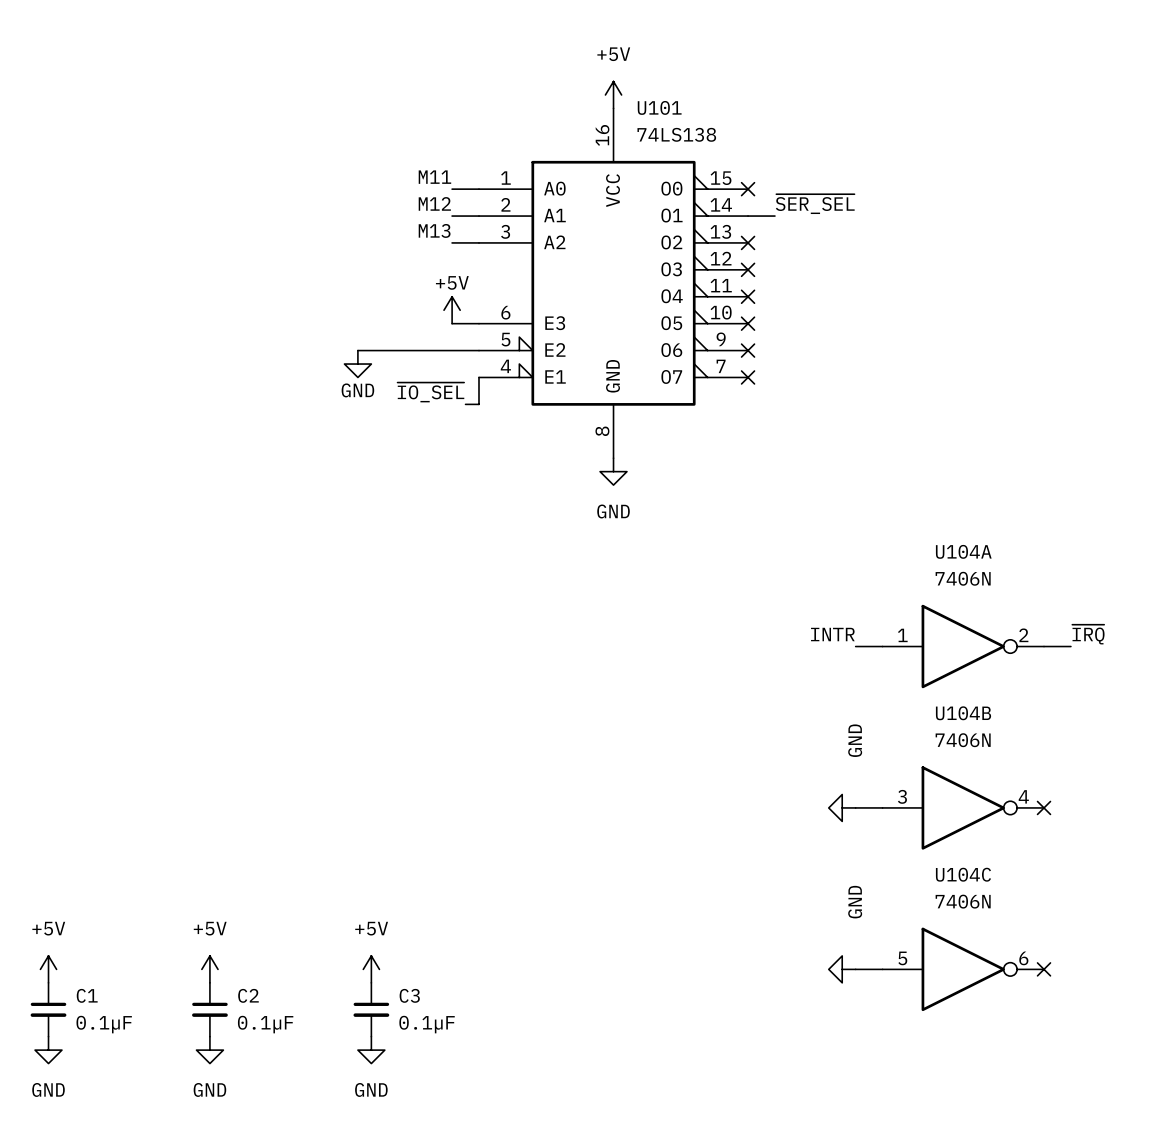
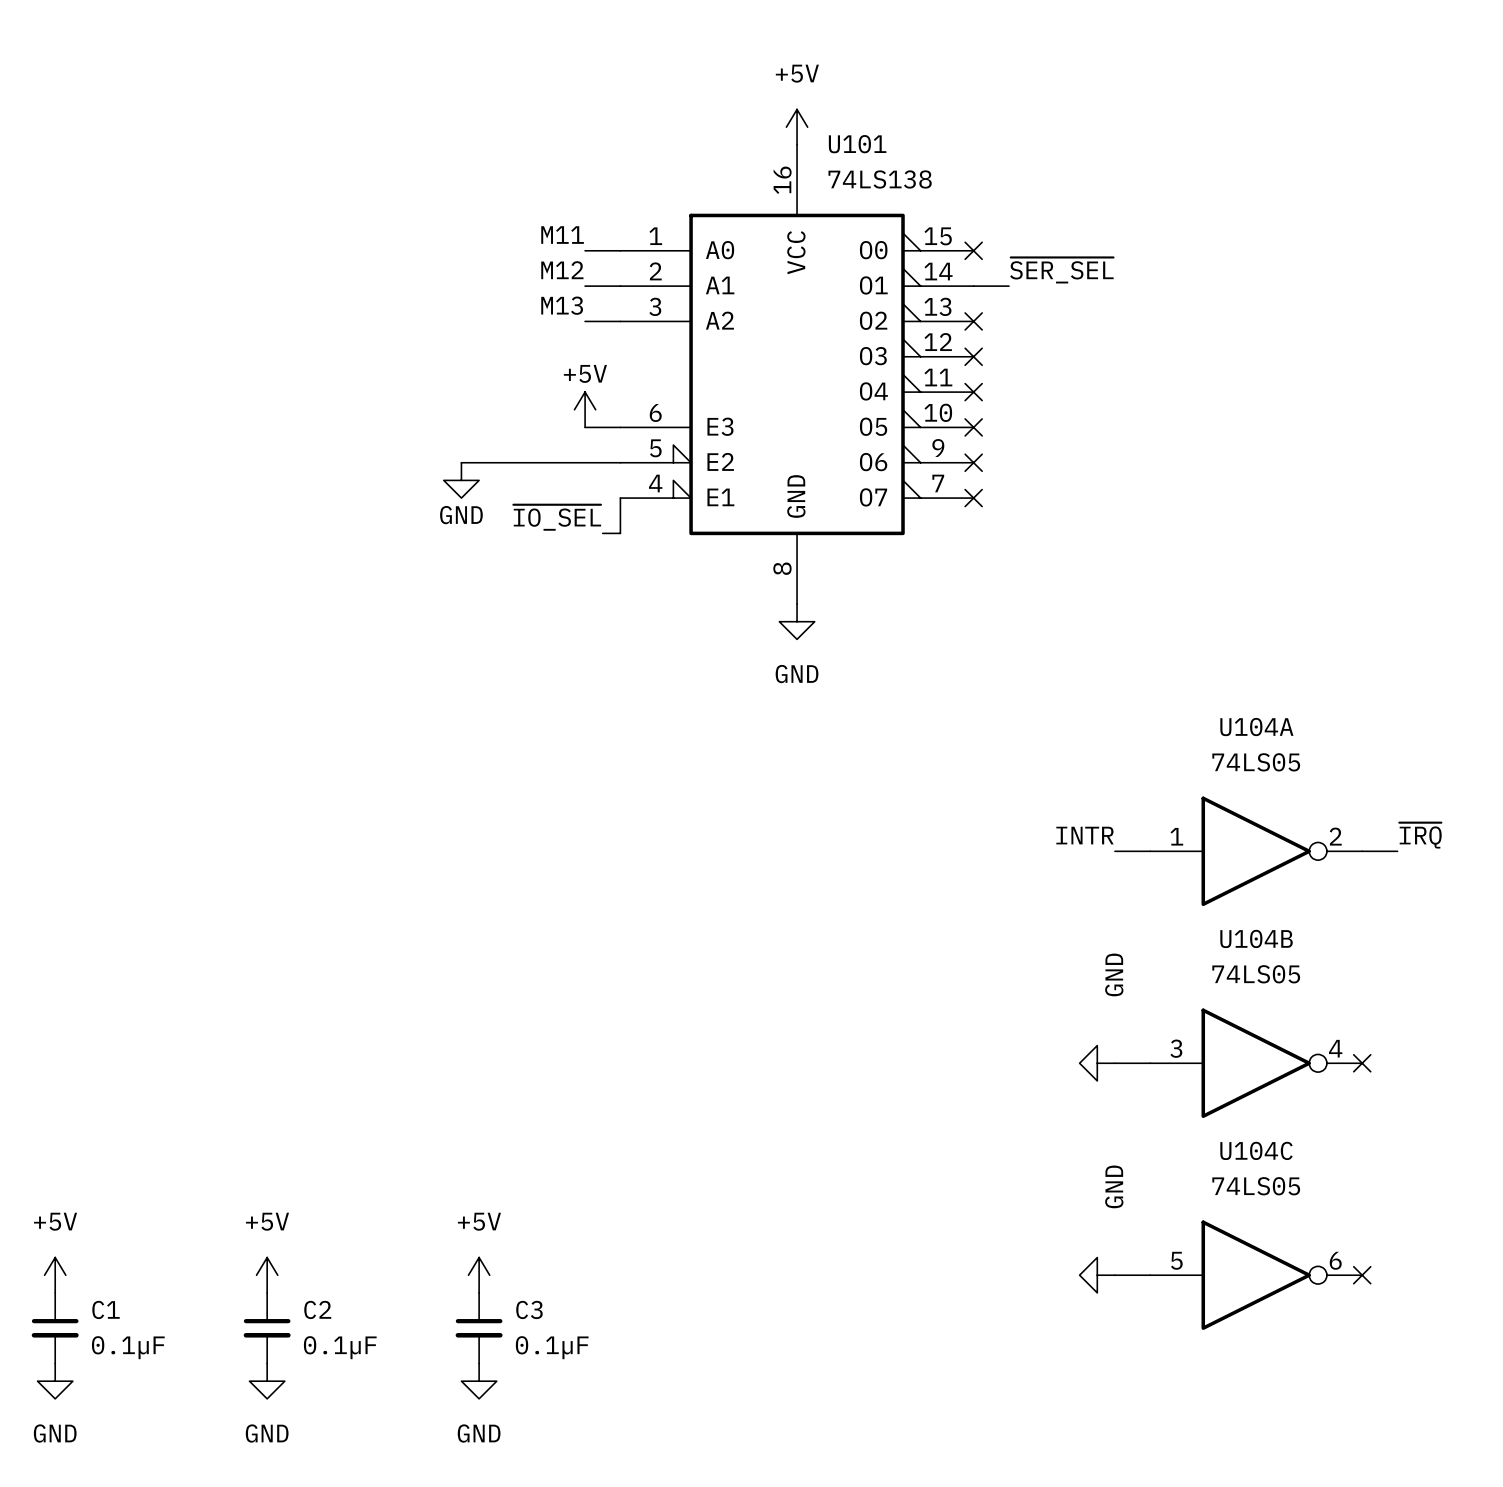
U104A value: 7406N (963, 578) -> 74LS05 (1256, 762)
U104B value: 7406N (963, 740) -> 74LS05 (1256, 974)
U104C value: 7406N (963, 901) -> 74LS05 (1256, 1186)

